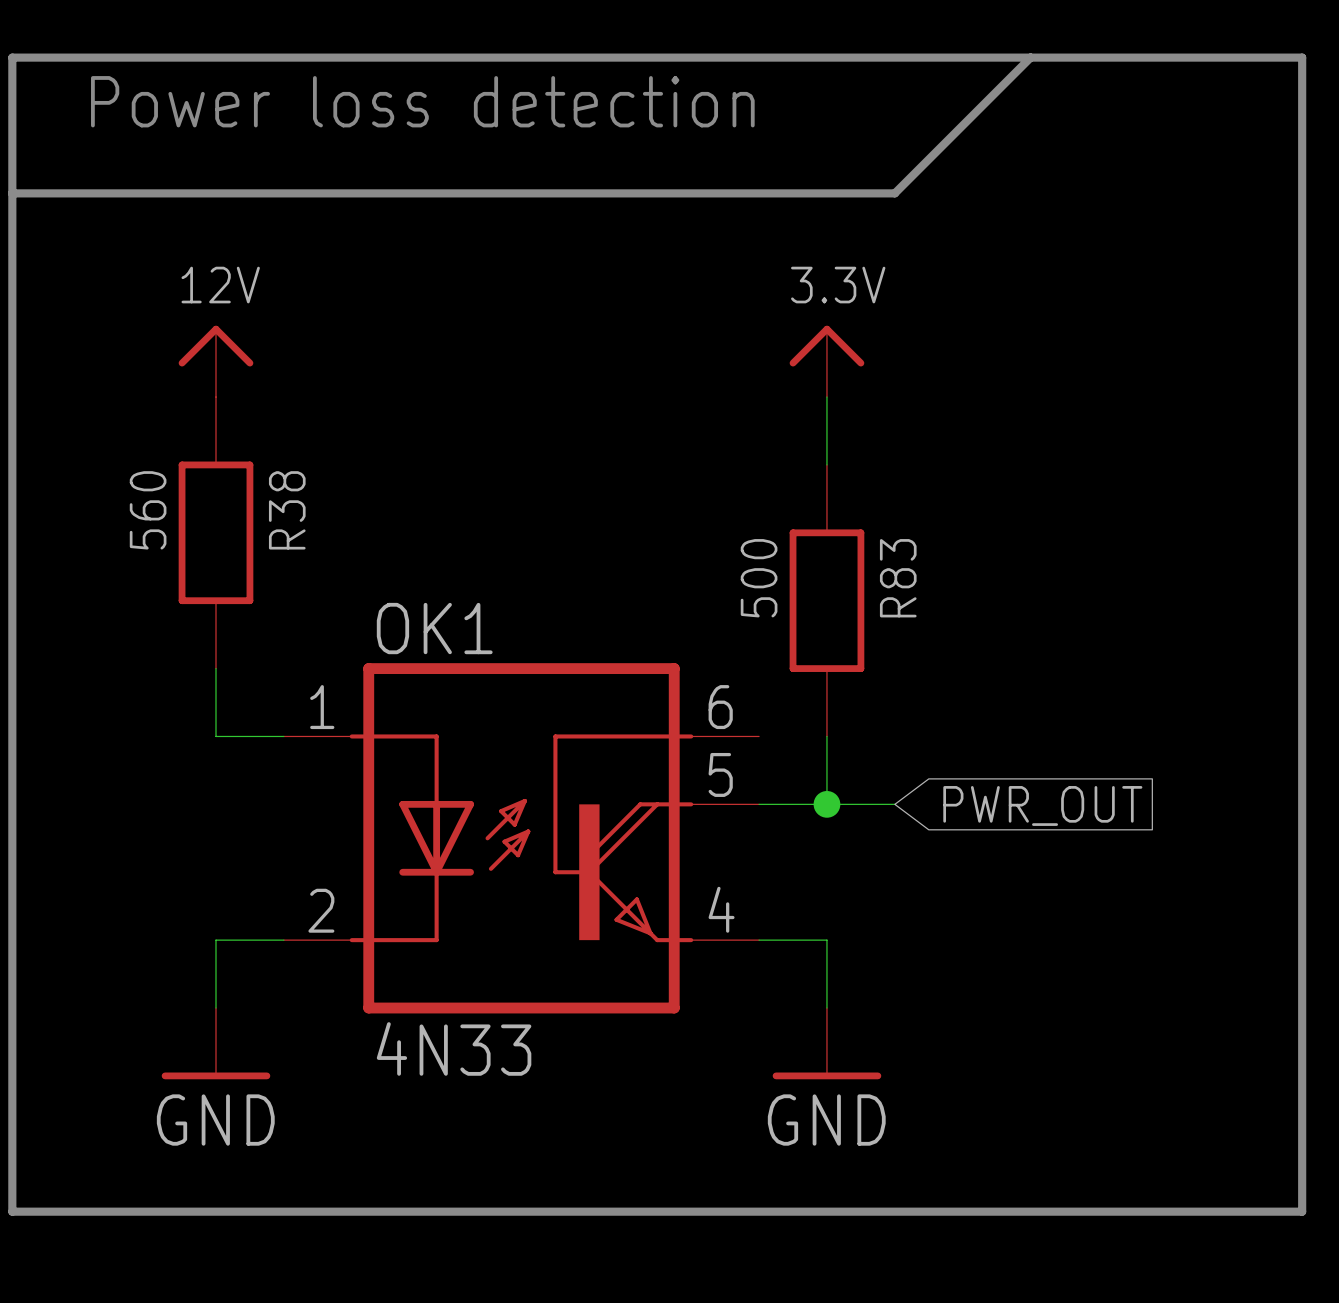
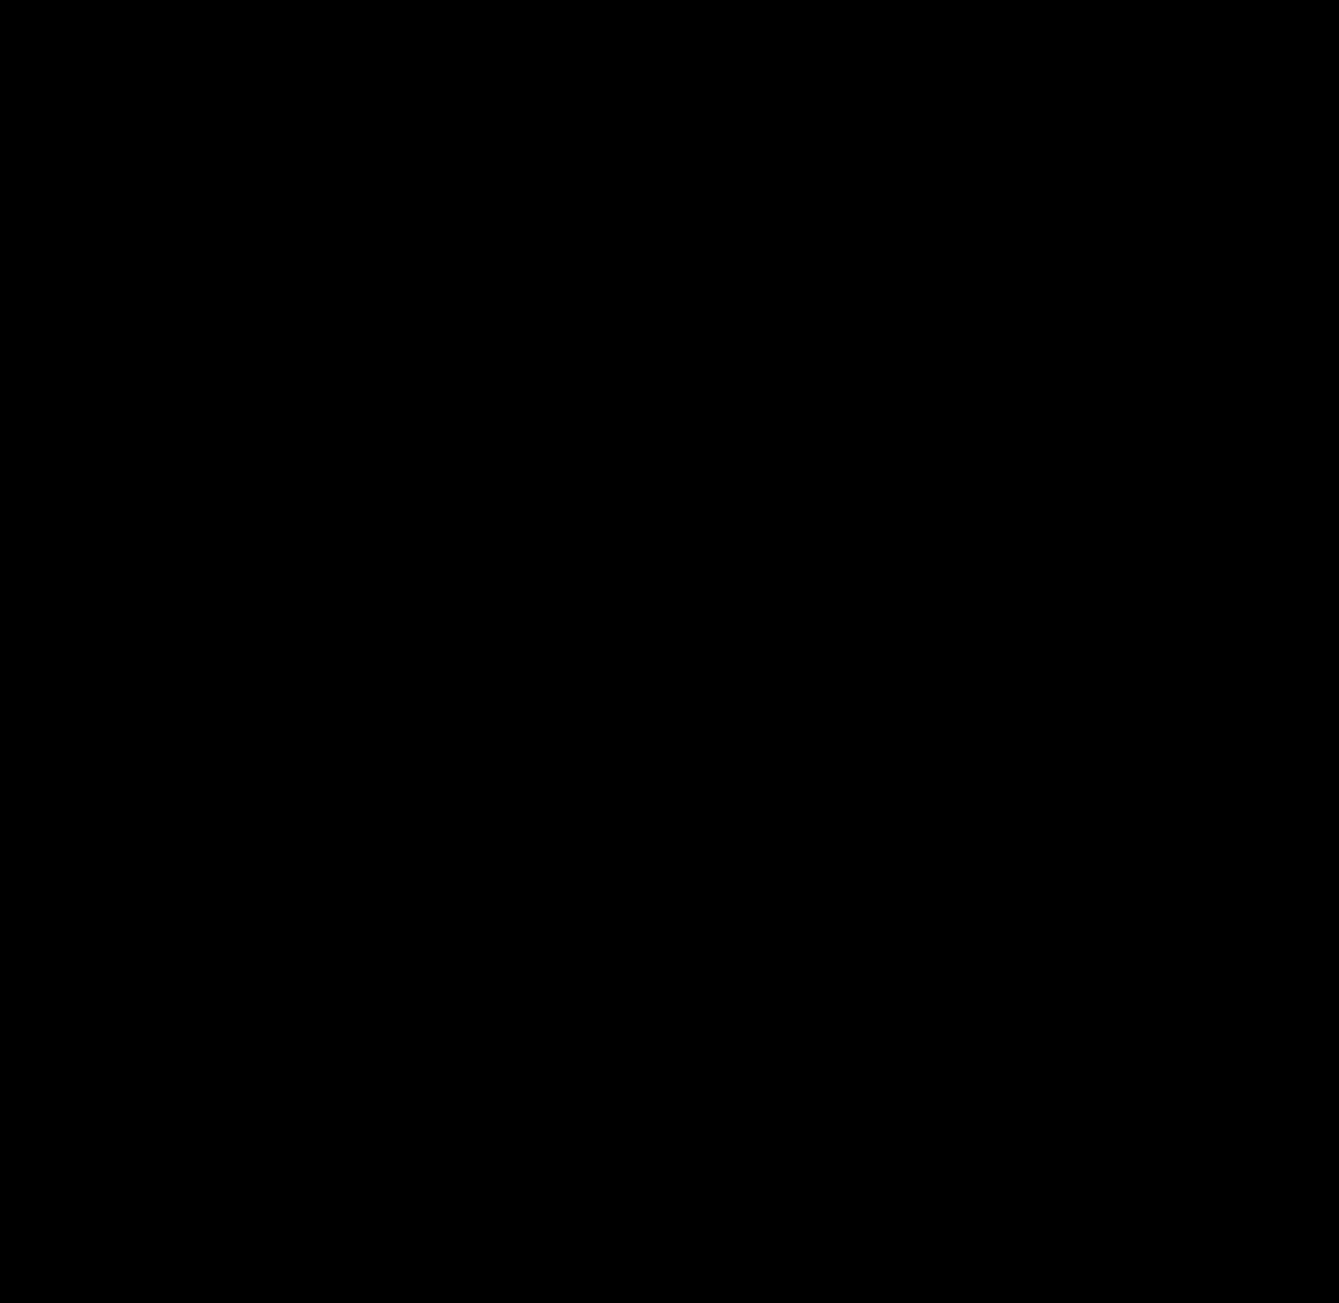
line: (12, 57) (12, 1211) (1302, 1211) (1302, 57) (12, 57) -> none
line: (1030, 57) (894, 193) (12, 193) -> none
text: Power loss detection (422, 101) -> none
power symbol: 12V (215, 361) -> none
power symbol: 3.3V (826, 361) -> none
wire: (826, 397) (826, 464) -> none
R38: 560 (215, 532) -> none
R83: 500 (826, 600) -> none
wire: (215, 668) (215, 736) (283, 736) -> none
wire: (826, 736) (826, 804) -> none
wire: (759, 804) (894, 804) -> none
junction: (826, 804) -> none
global label: PWR_OUT (1042, 805) -> none
OK1: 4N33 (521, 838) -> none
wire: (283, 940) (215, 940) (215, 1008) -> none
wire: (759, 940) (826, 940) (826, 1008) -> none
power symbol: GND (215, 1043) -> none
power symbol: GND (826, 1043) -> none

